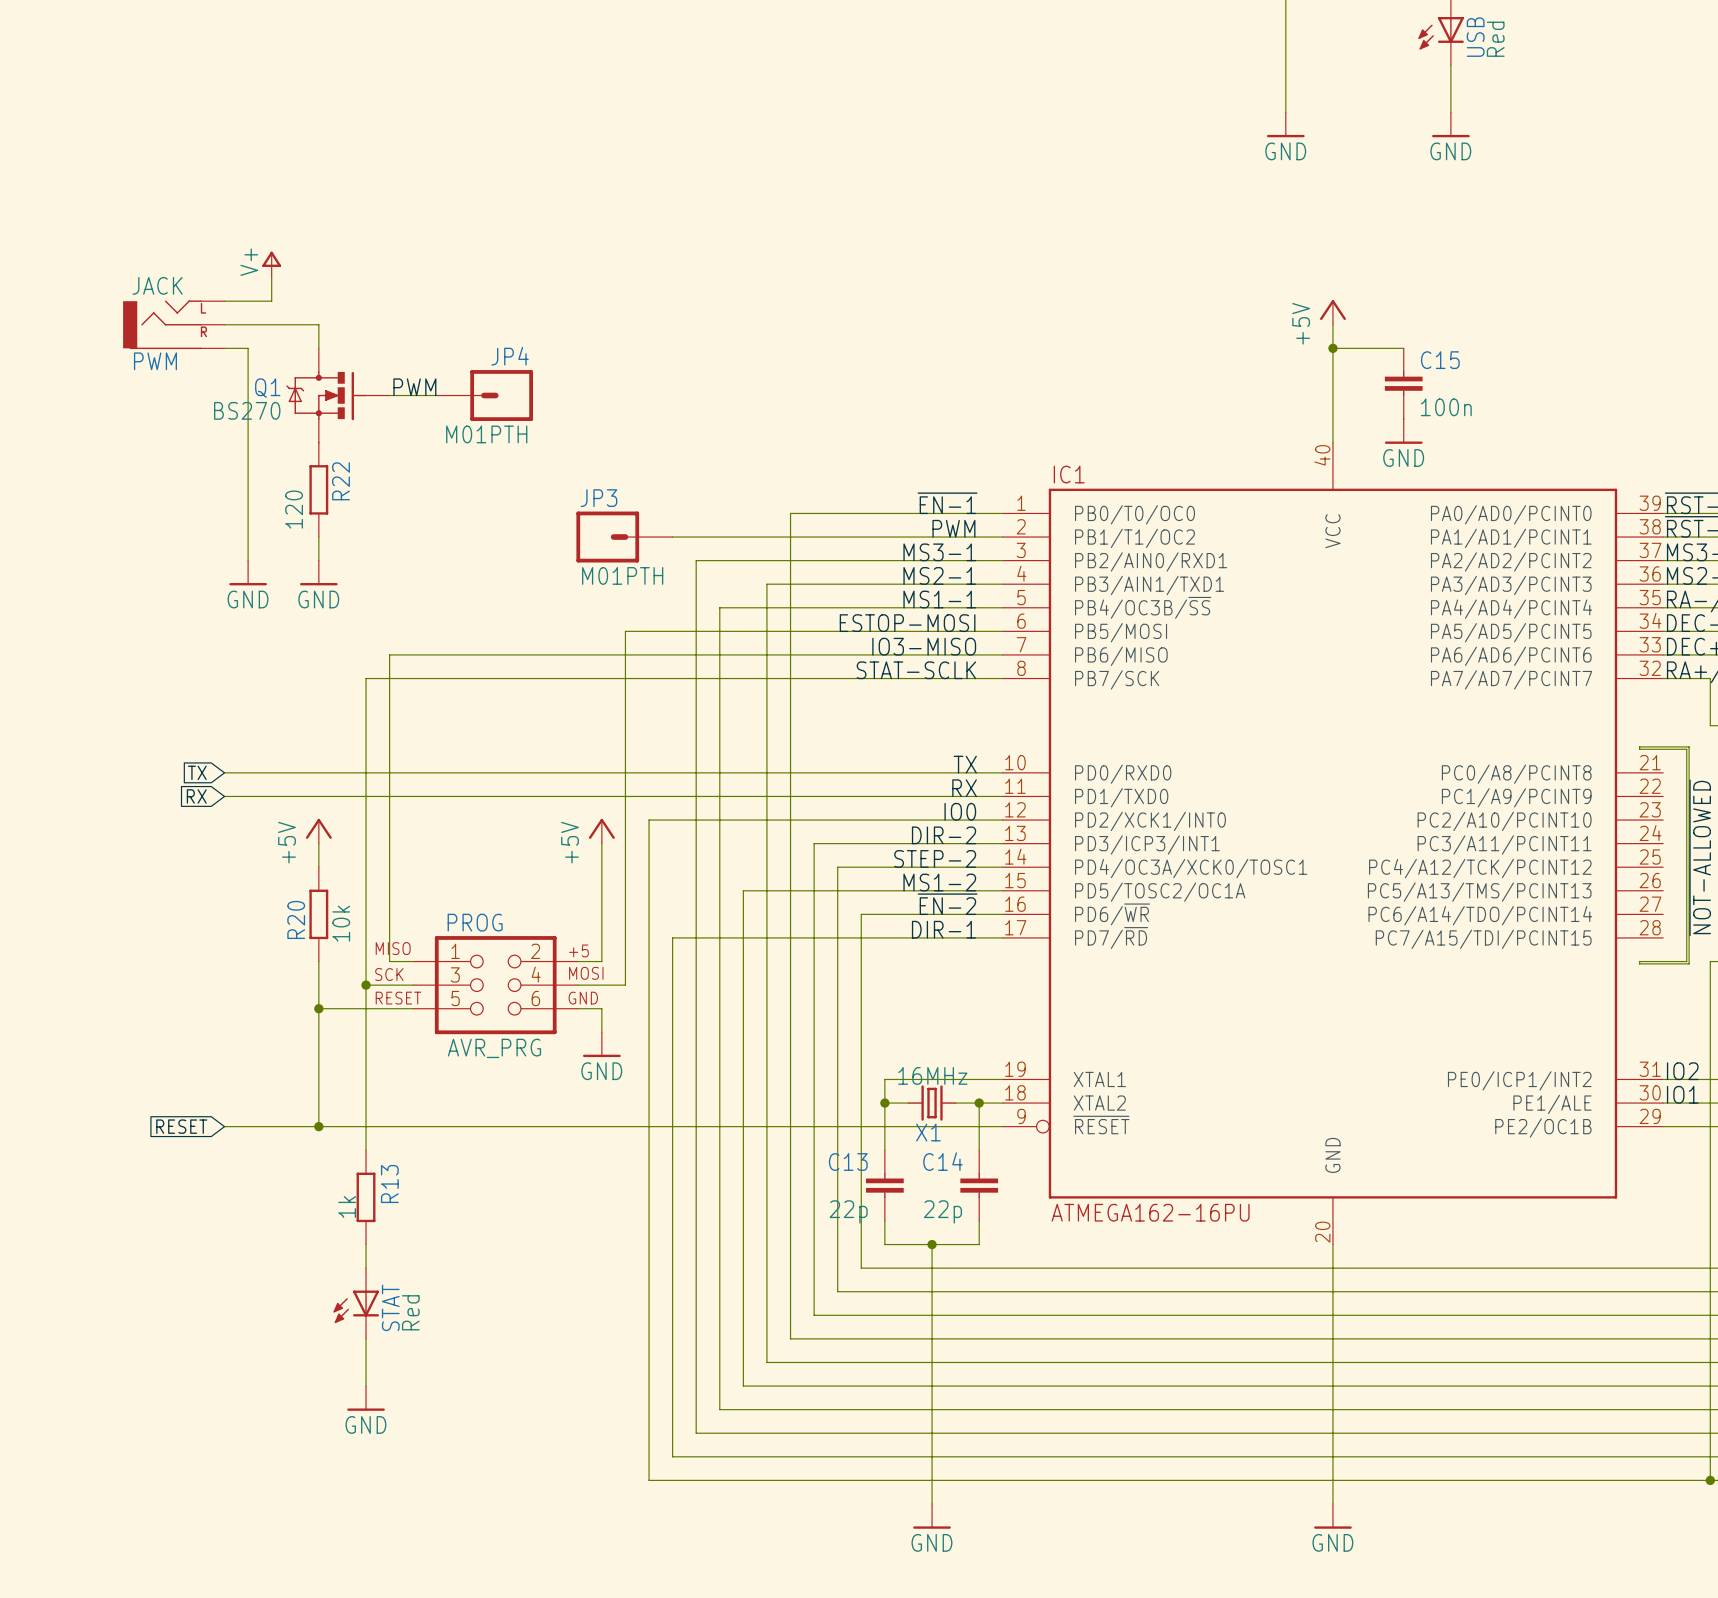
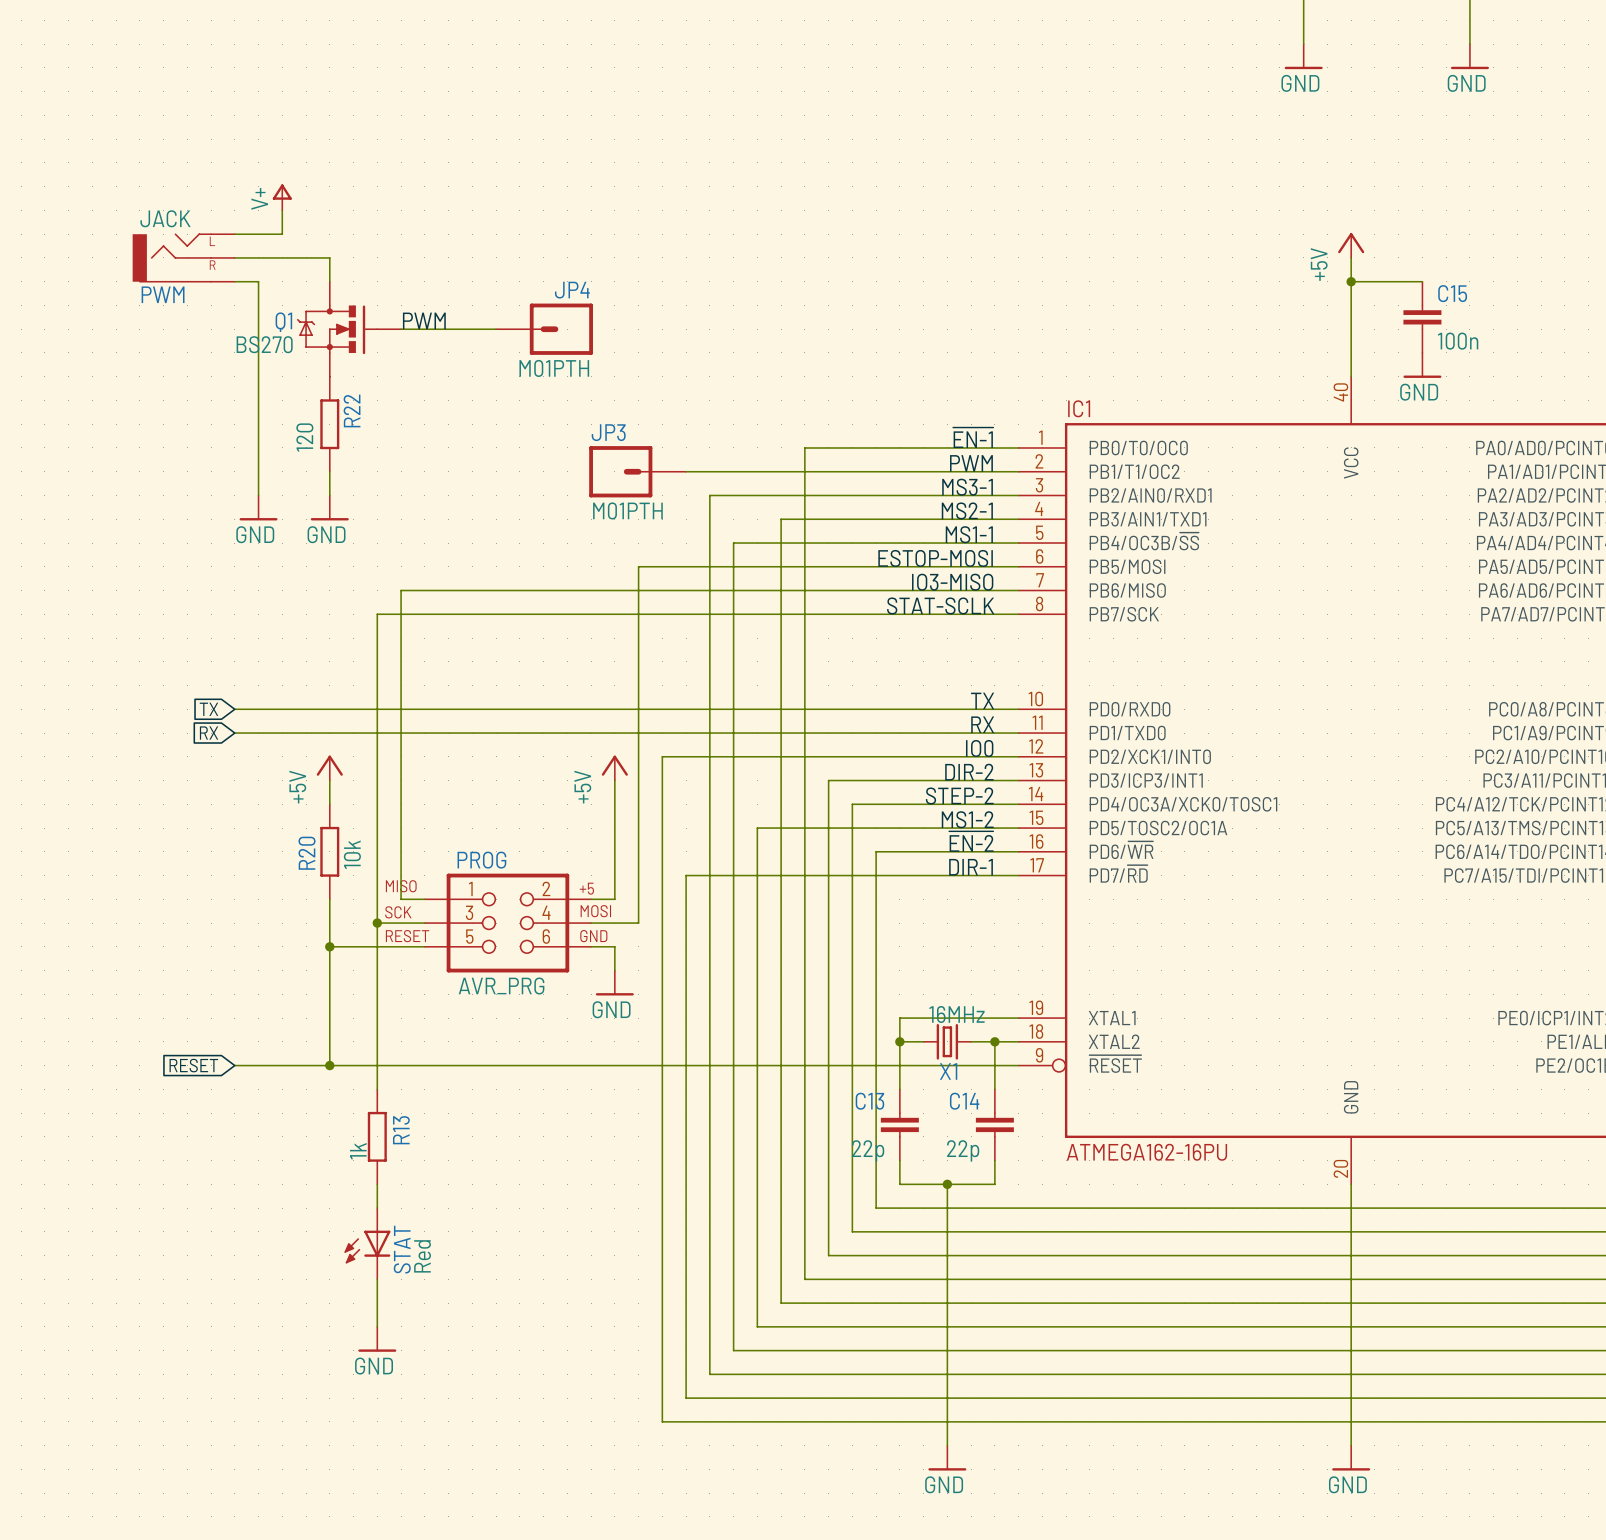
JP4 position: (484, 395) -> (544, 329)

